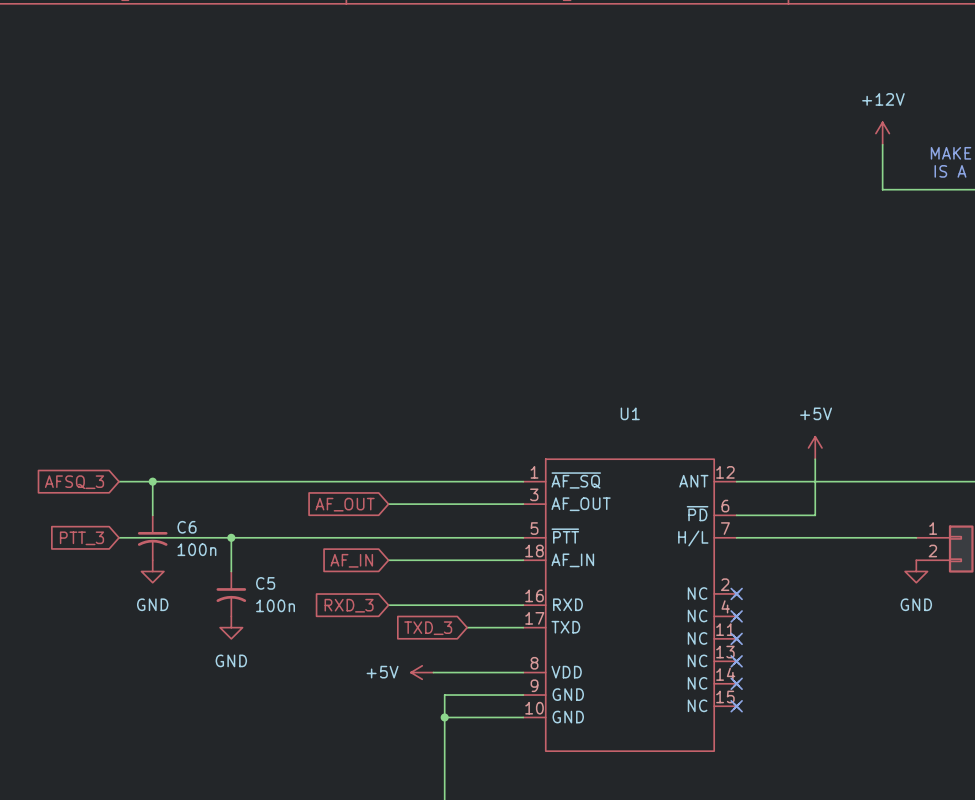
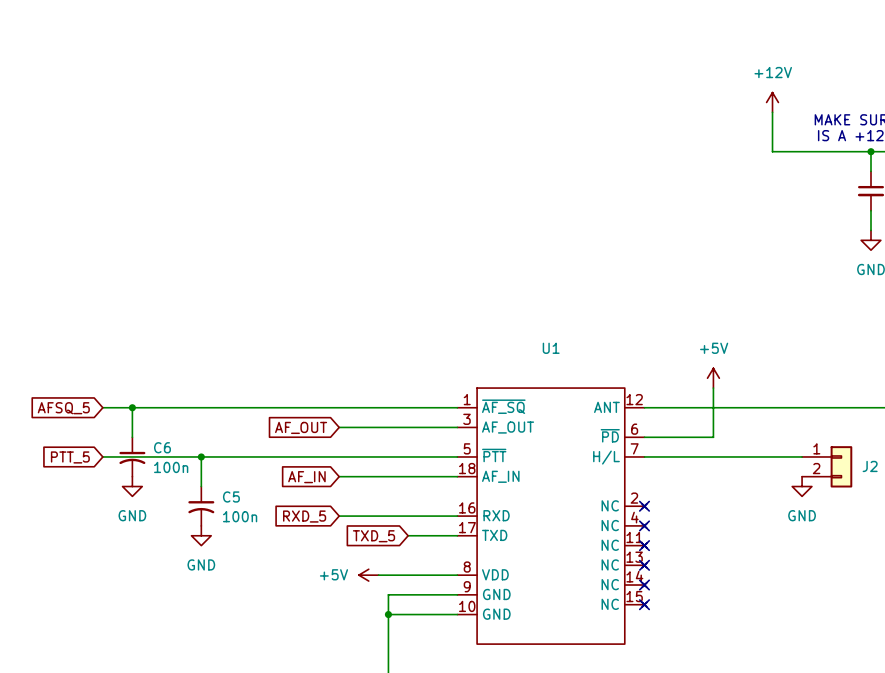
global label: AFSQ_3 (74, 482) -> AFSQ_5 (63, 408)
global label: PTT_3 (81, 538) -> PTT_5 (70, 457)
global label: RXD_3 (349, 605) -> RXD_5 (304, 516)
global label: TXD_3 (428, 628) -> TXD_5 (374, 536)

